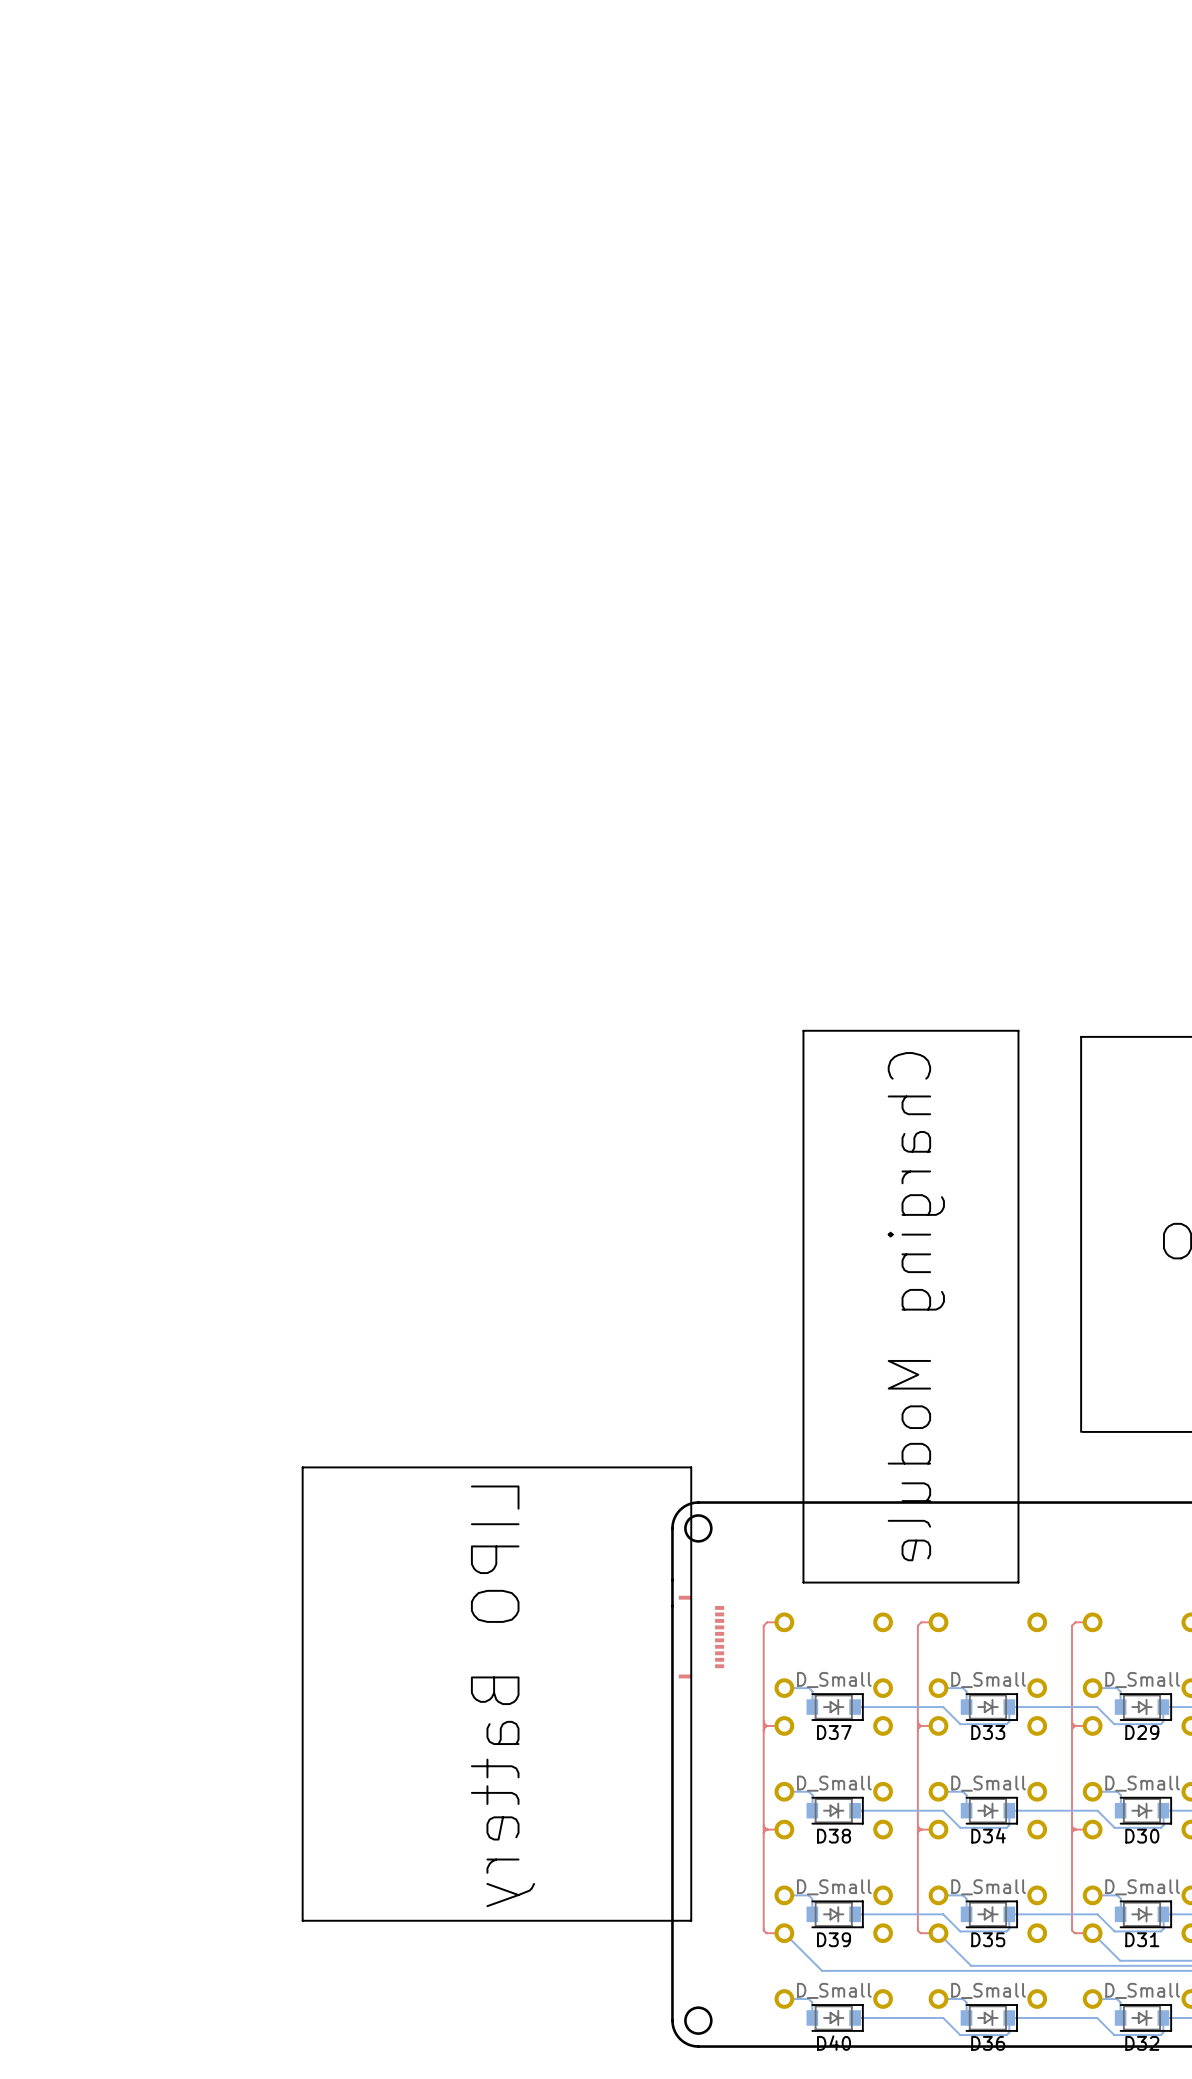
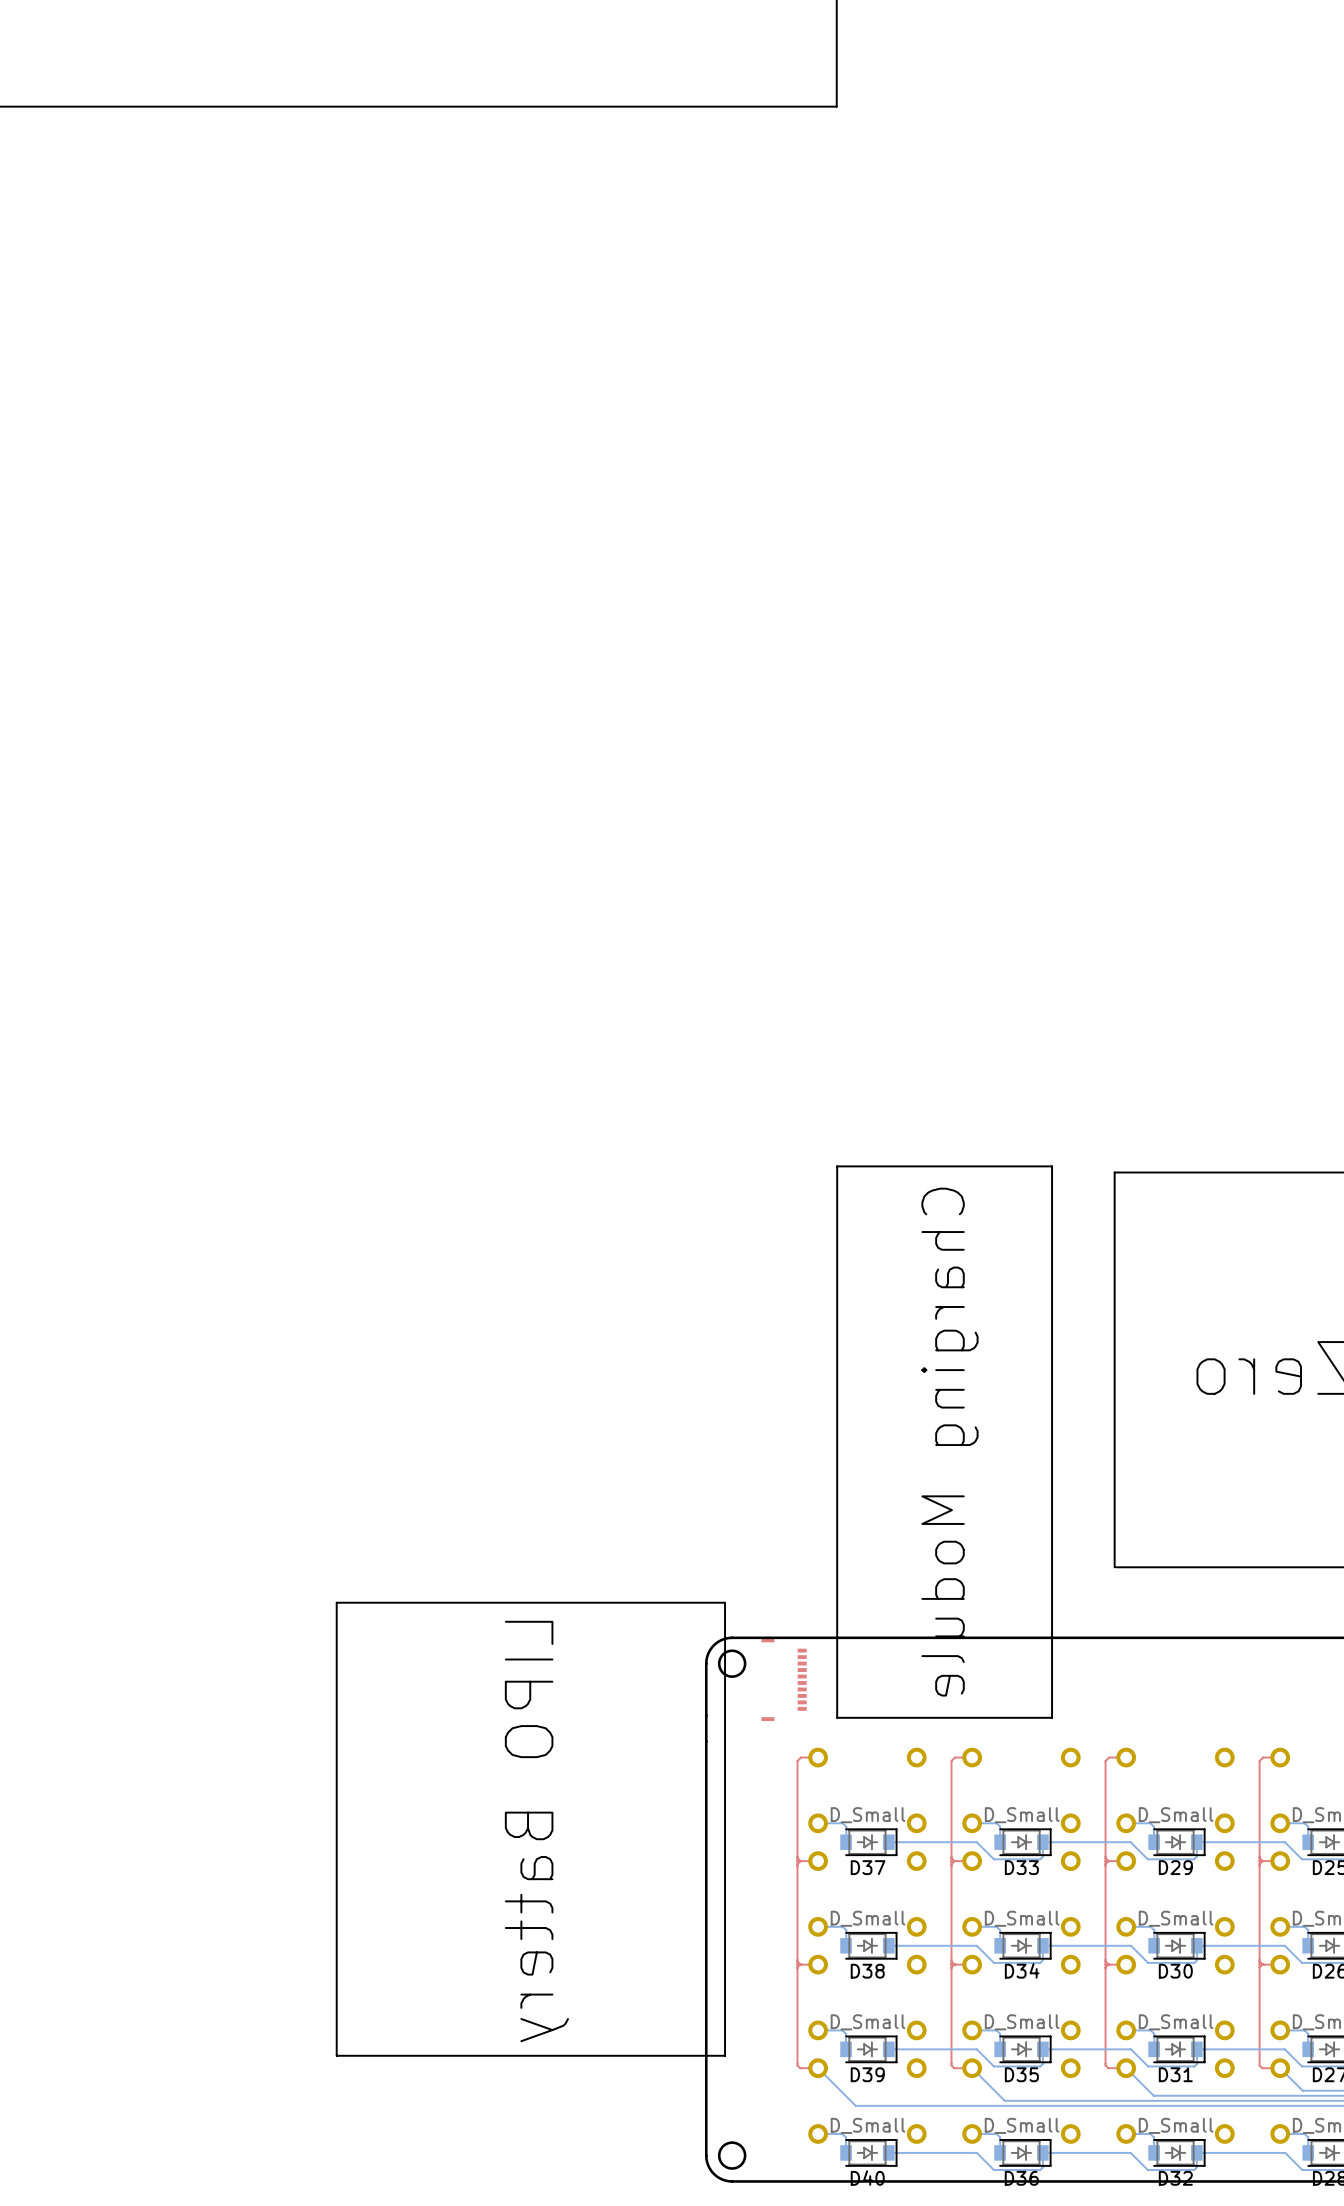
part position: (701, 1637) -> (784, 1679)

